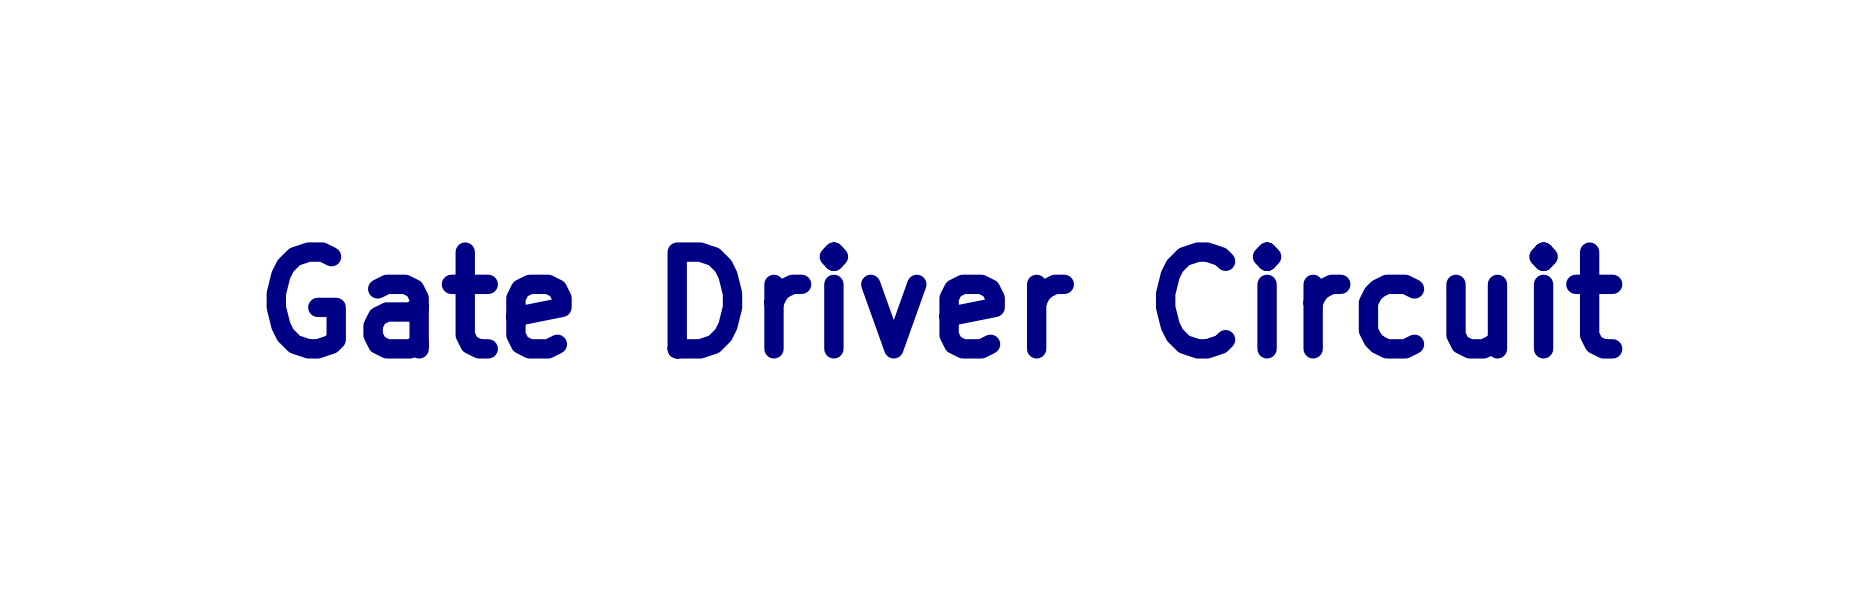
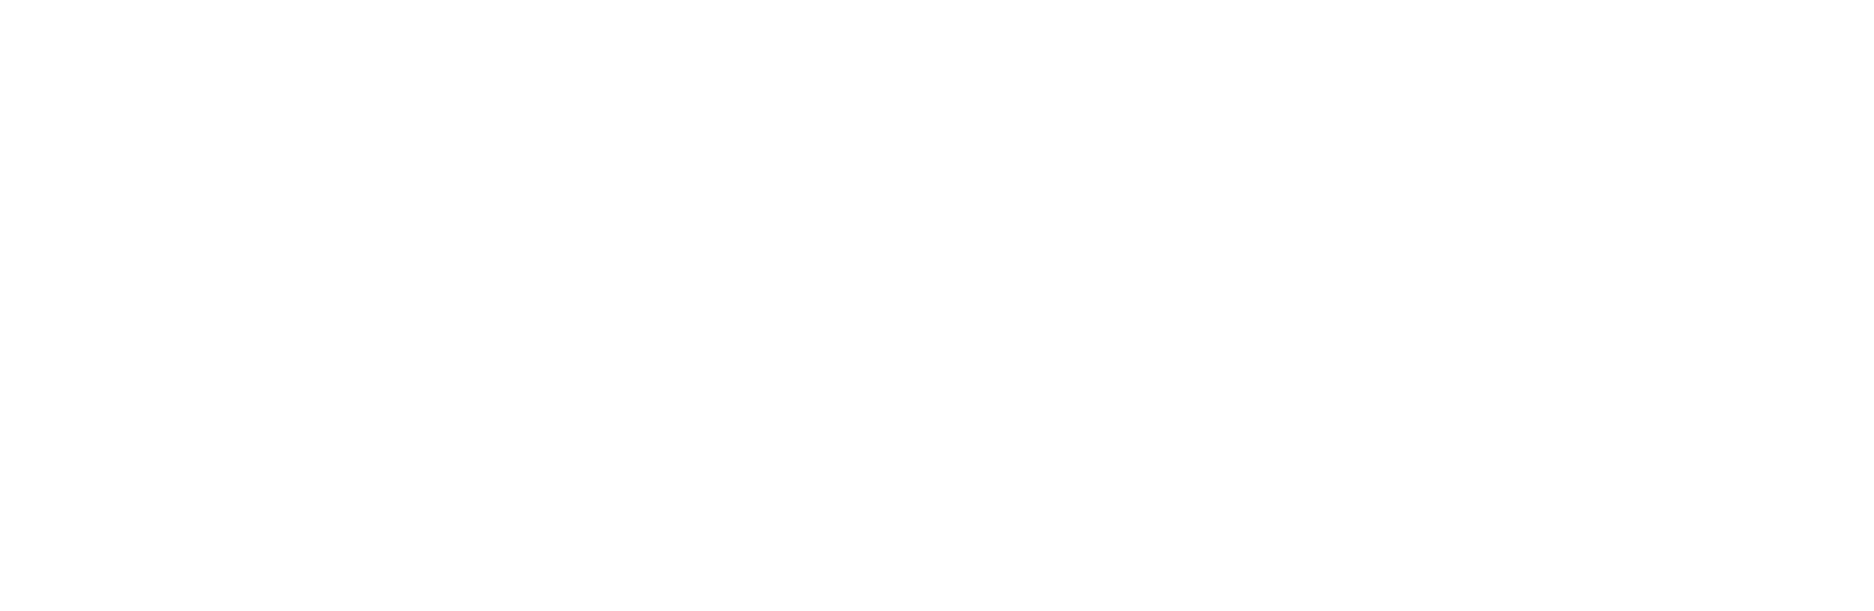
text: Gate Driver Circuit (944, 300) -> none

